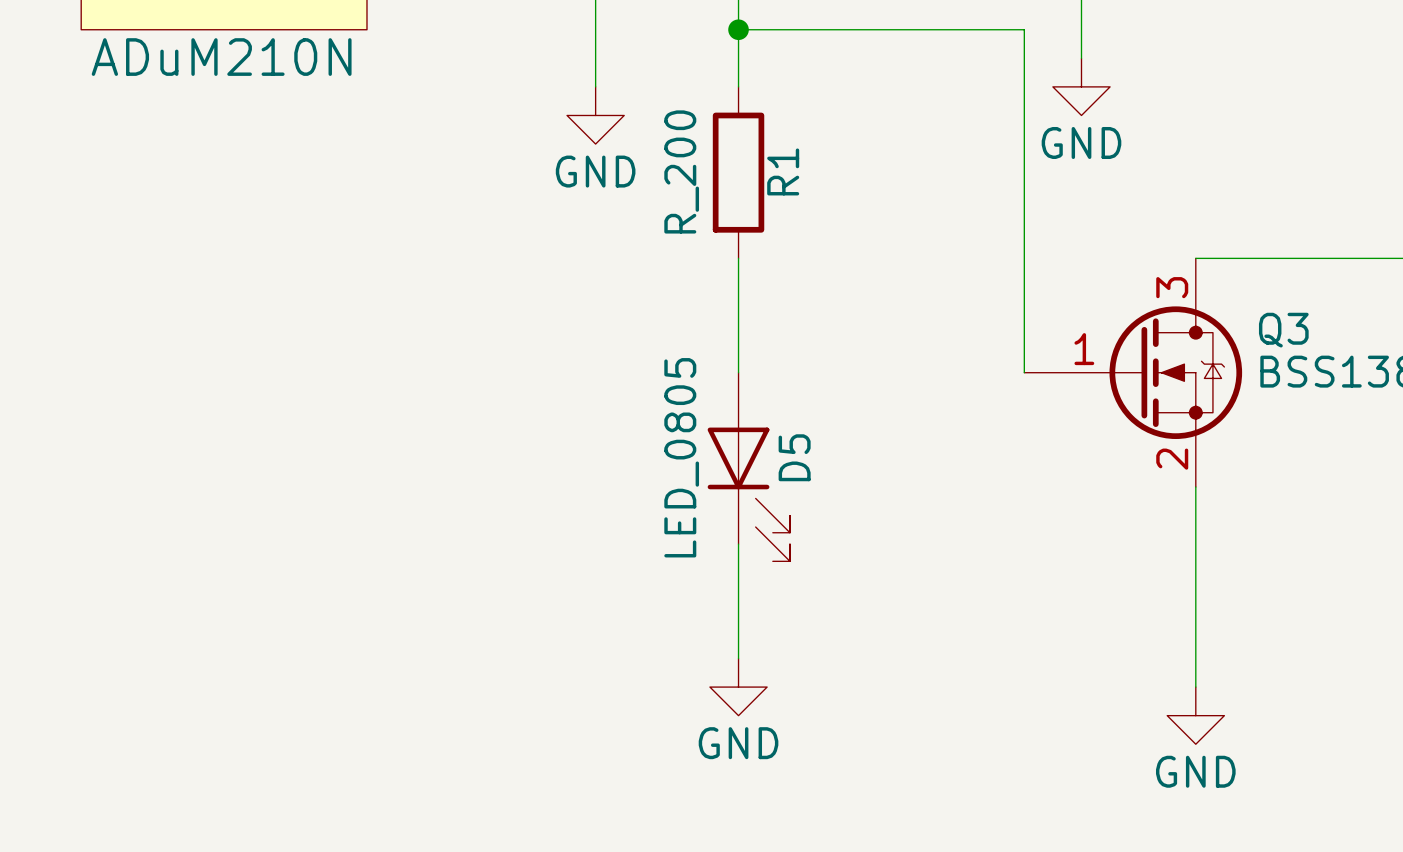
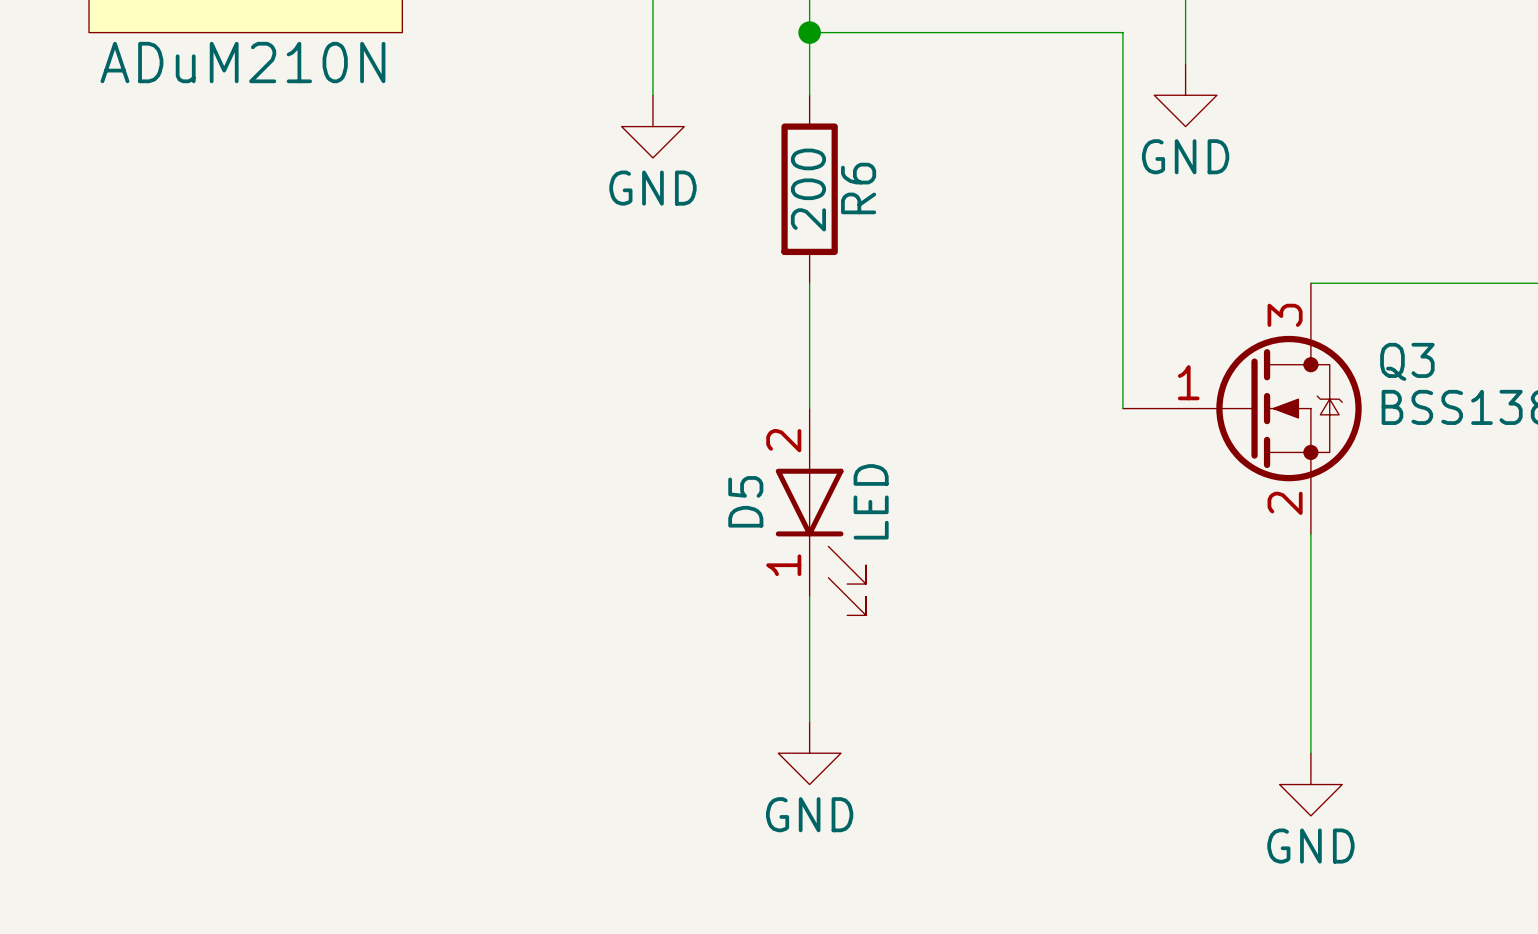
R1 value: R_200 (681, 171) -> 200 (808, 190)
R1 name: R1 (783, 171) -> R6 (858, 188)
D5 pin number: none -> 2 (783, 440)
D5 value: LED_0805 (681, 457) -> LED (871, 501)
D5 name position: D5 (794, 457) -> D5 (745, 501)
D5 pin number: none -> 1 (783, 565)

